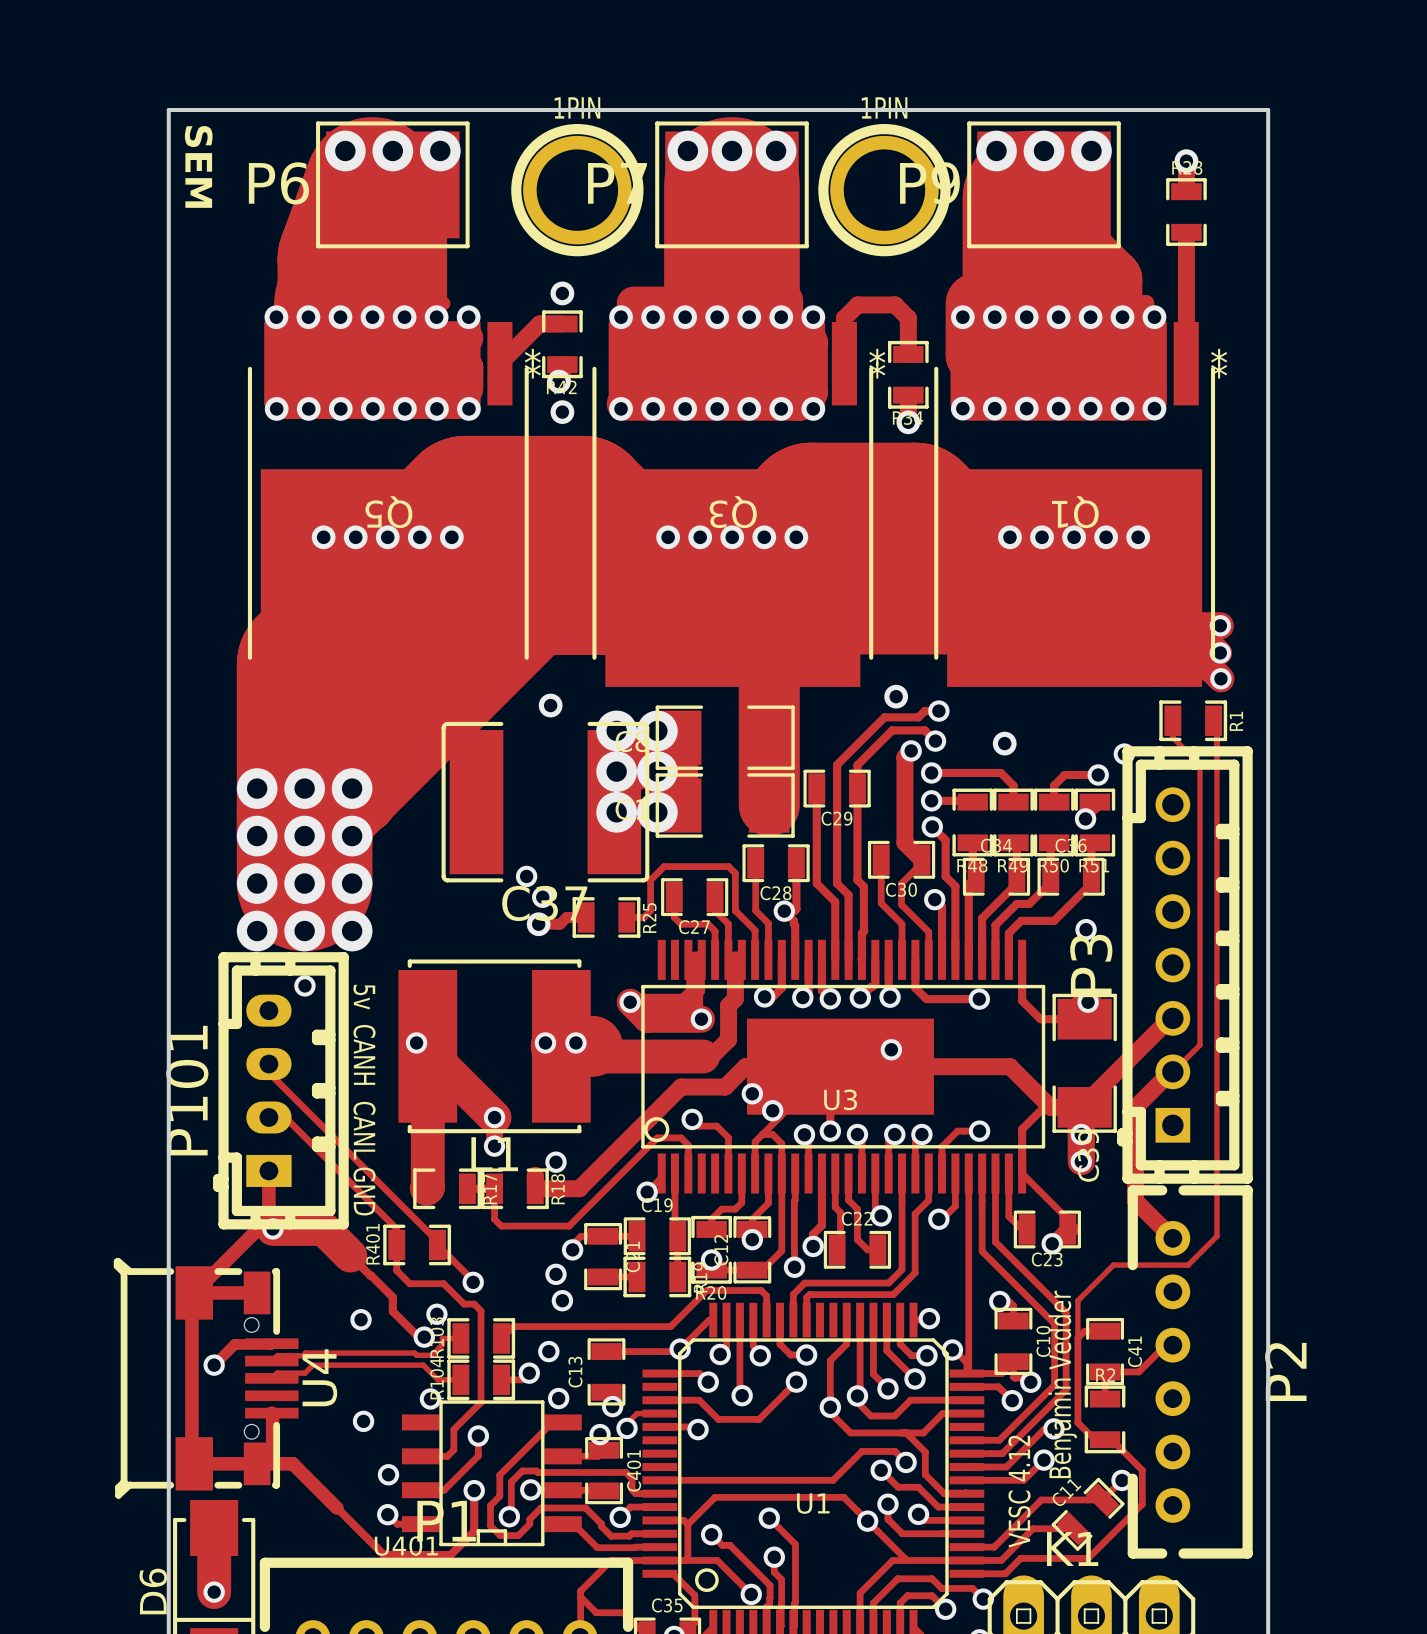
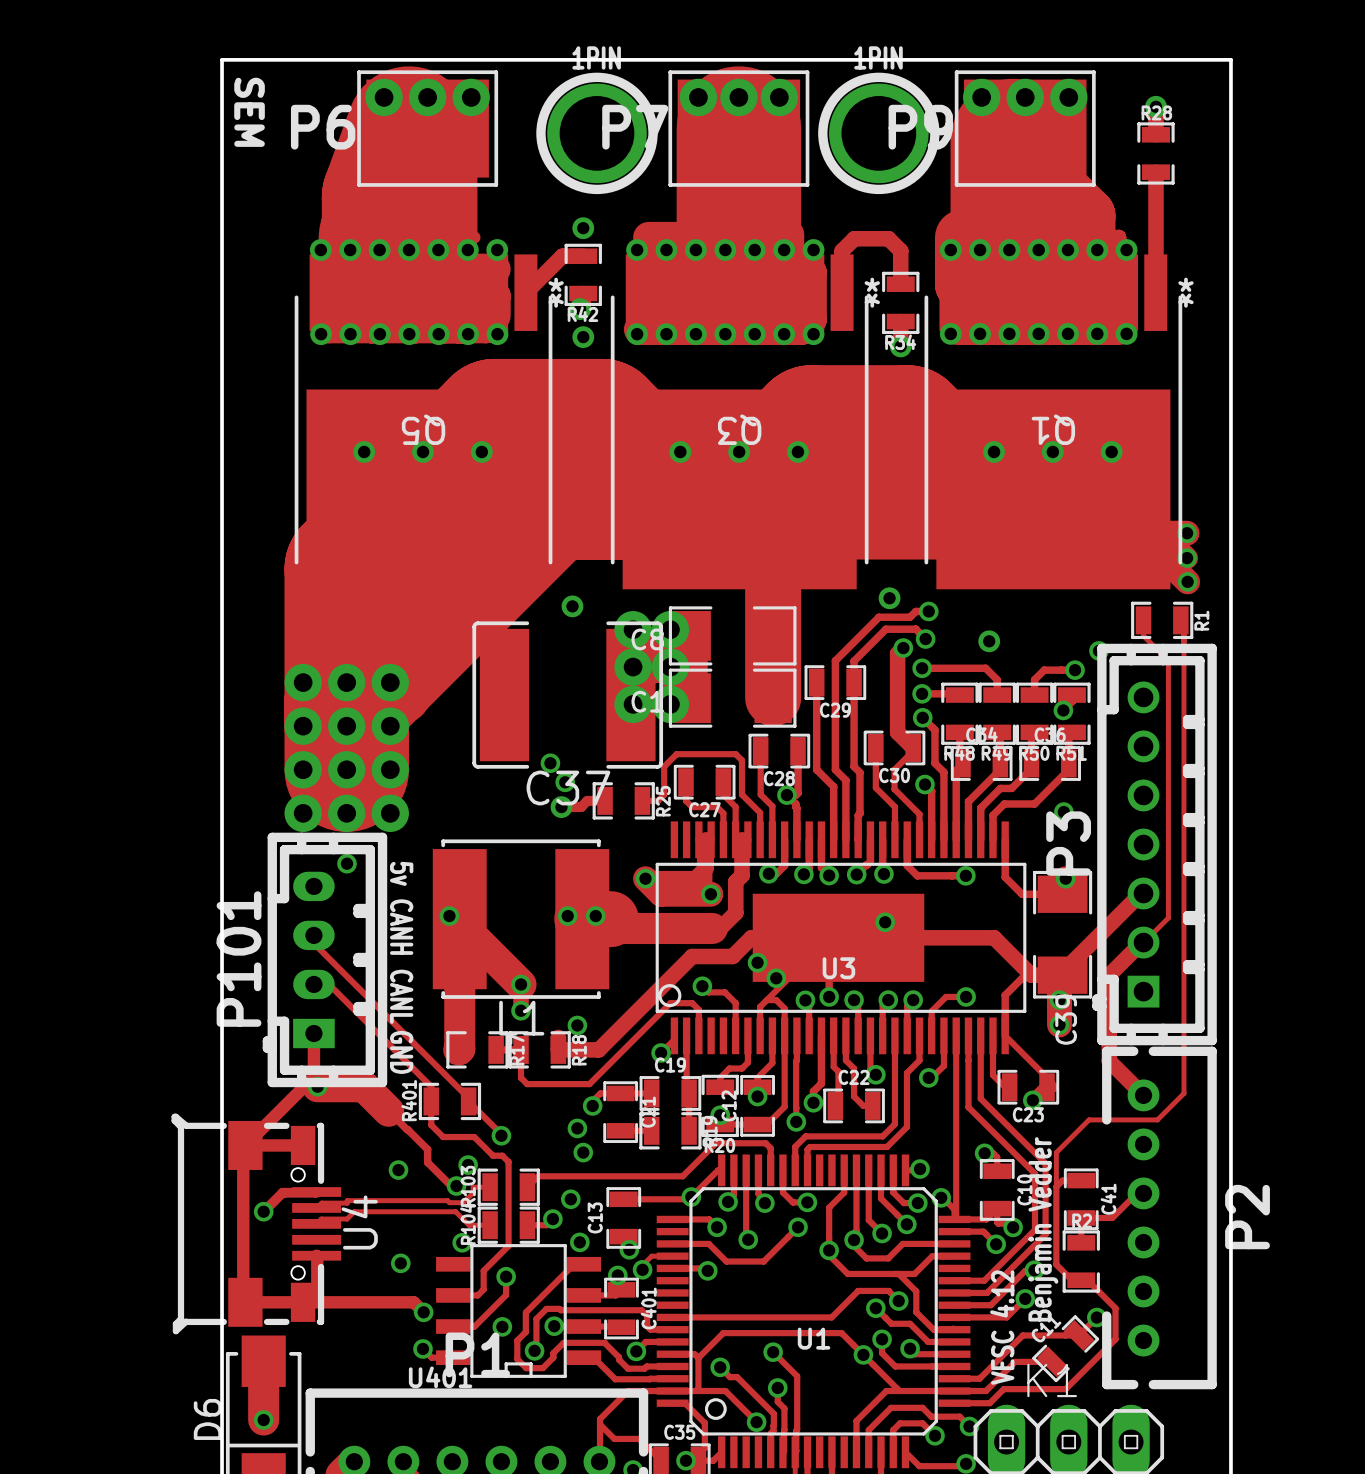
via: (355, 537) -> none
via: (419, 537) -> none
via: (700, 537) -> none
via: (764, 537) -> none
via: (1042, 537) -> none
via: (1106, 537) -> none
track: (292, 1463) (384, 1555) (450, 1555) (474, 1531) (474, 1490) -> (335, 1302) (413, 1302) (423, 1312)

